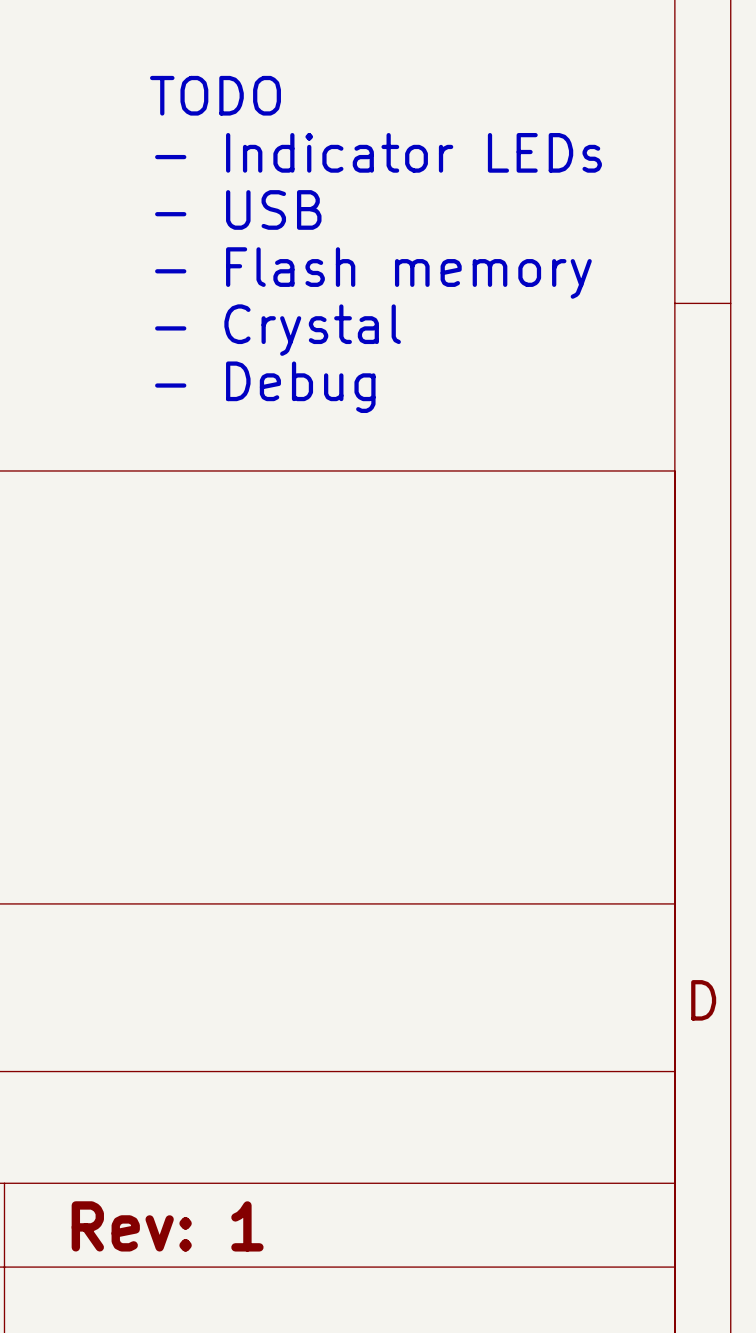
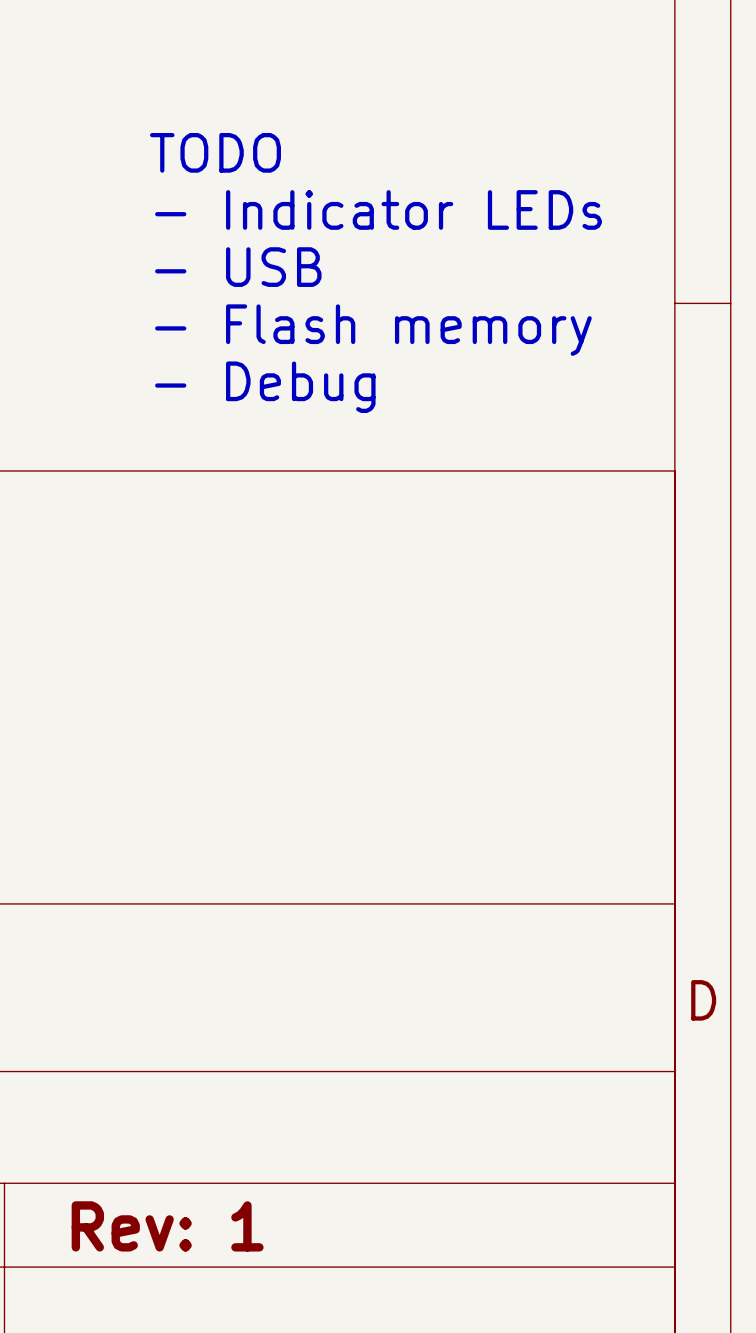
text: TODO (215, 95) -> none
text: - Indicator LEDs (378, 152) -> TODO (215, 152)
text: - USB (238, 209) -> - Indicator LEDs (378, 209)
text: - Flash memory (373, 272) -> - USB (238, 267)
text: - Crystal (277, 330) -> - Flash memory (373, 330)

